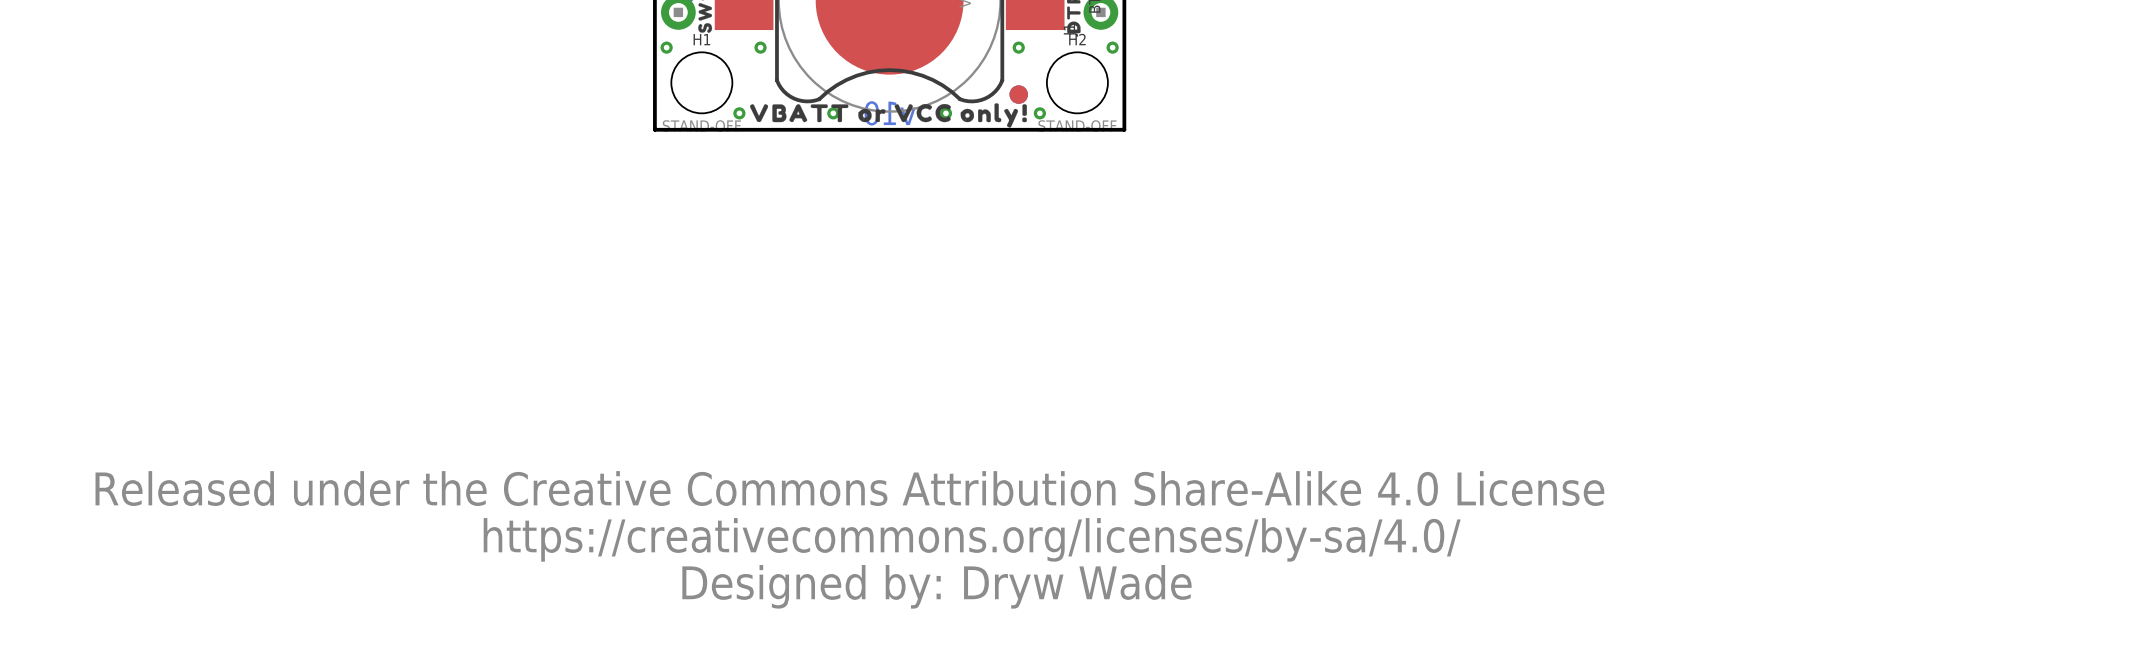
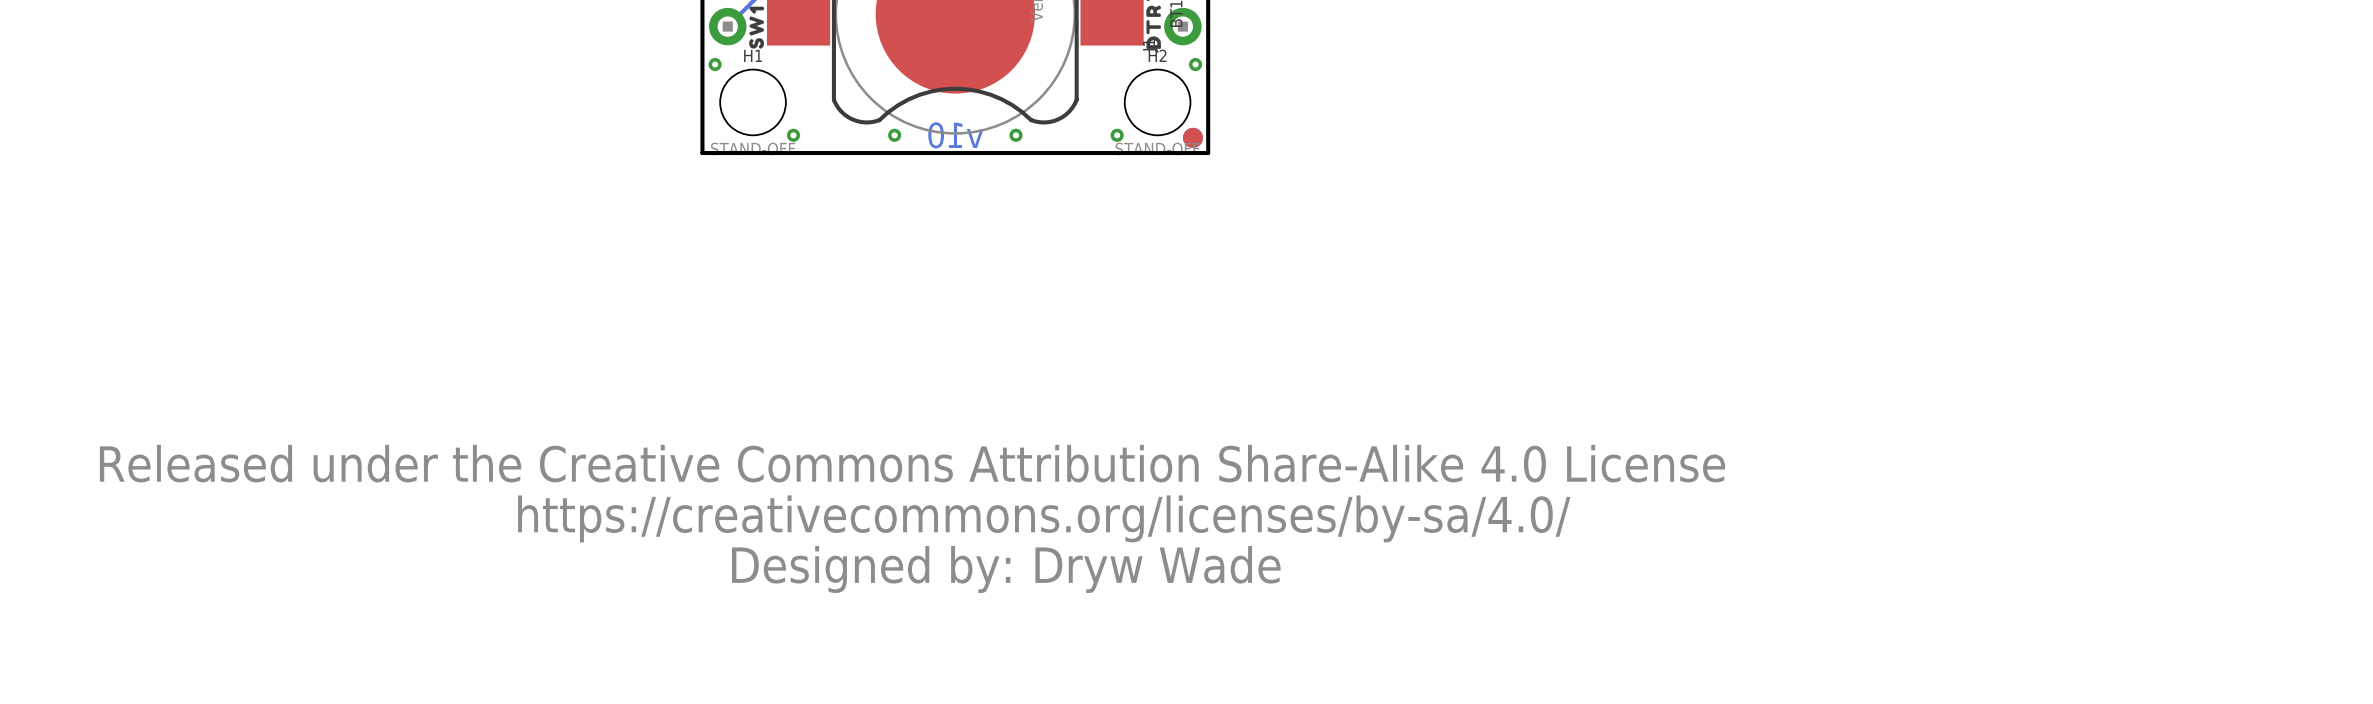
via: (760, 47) -> none
via: (1018, 47) -> none
part position: (1018, 94) -> (1192, 137)
drawing: [750, 103, 1027, 128] -> none
drawing position: (849, 539) -> (912, 518)
text position: Dryw Wade (1077, 586) -> Dryw Wade (1158, 569)

